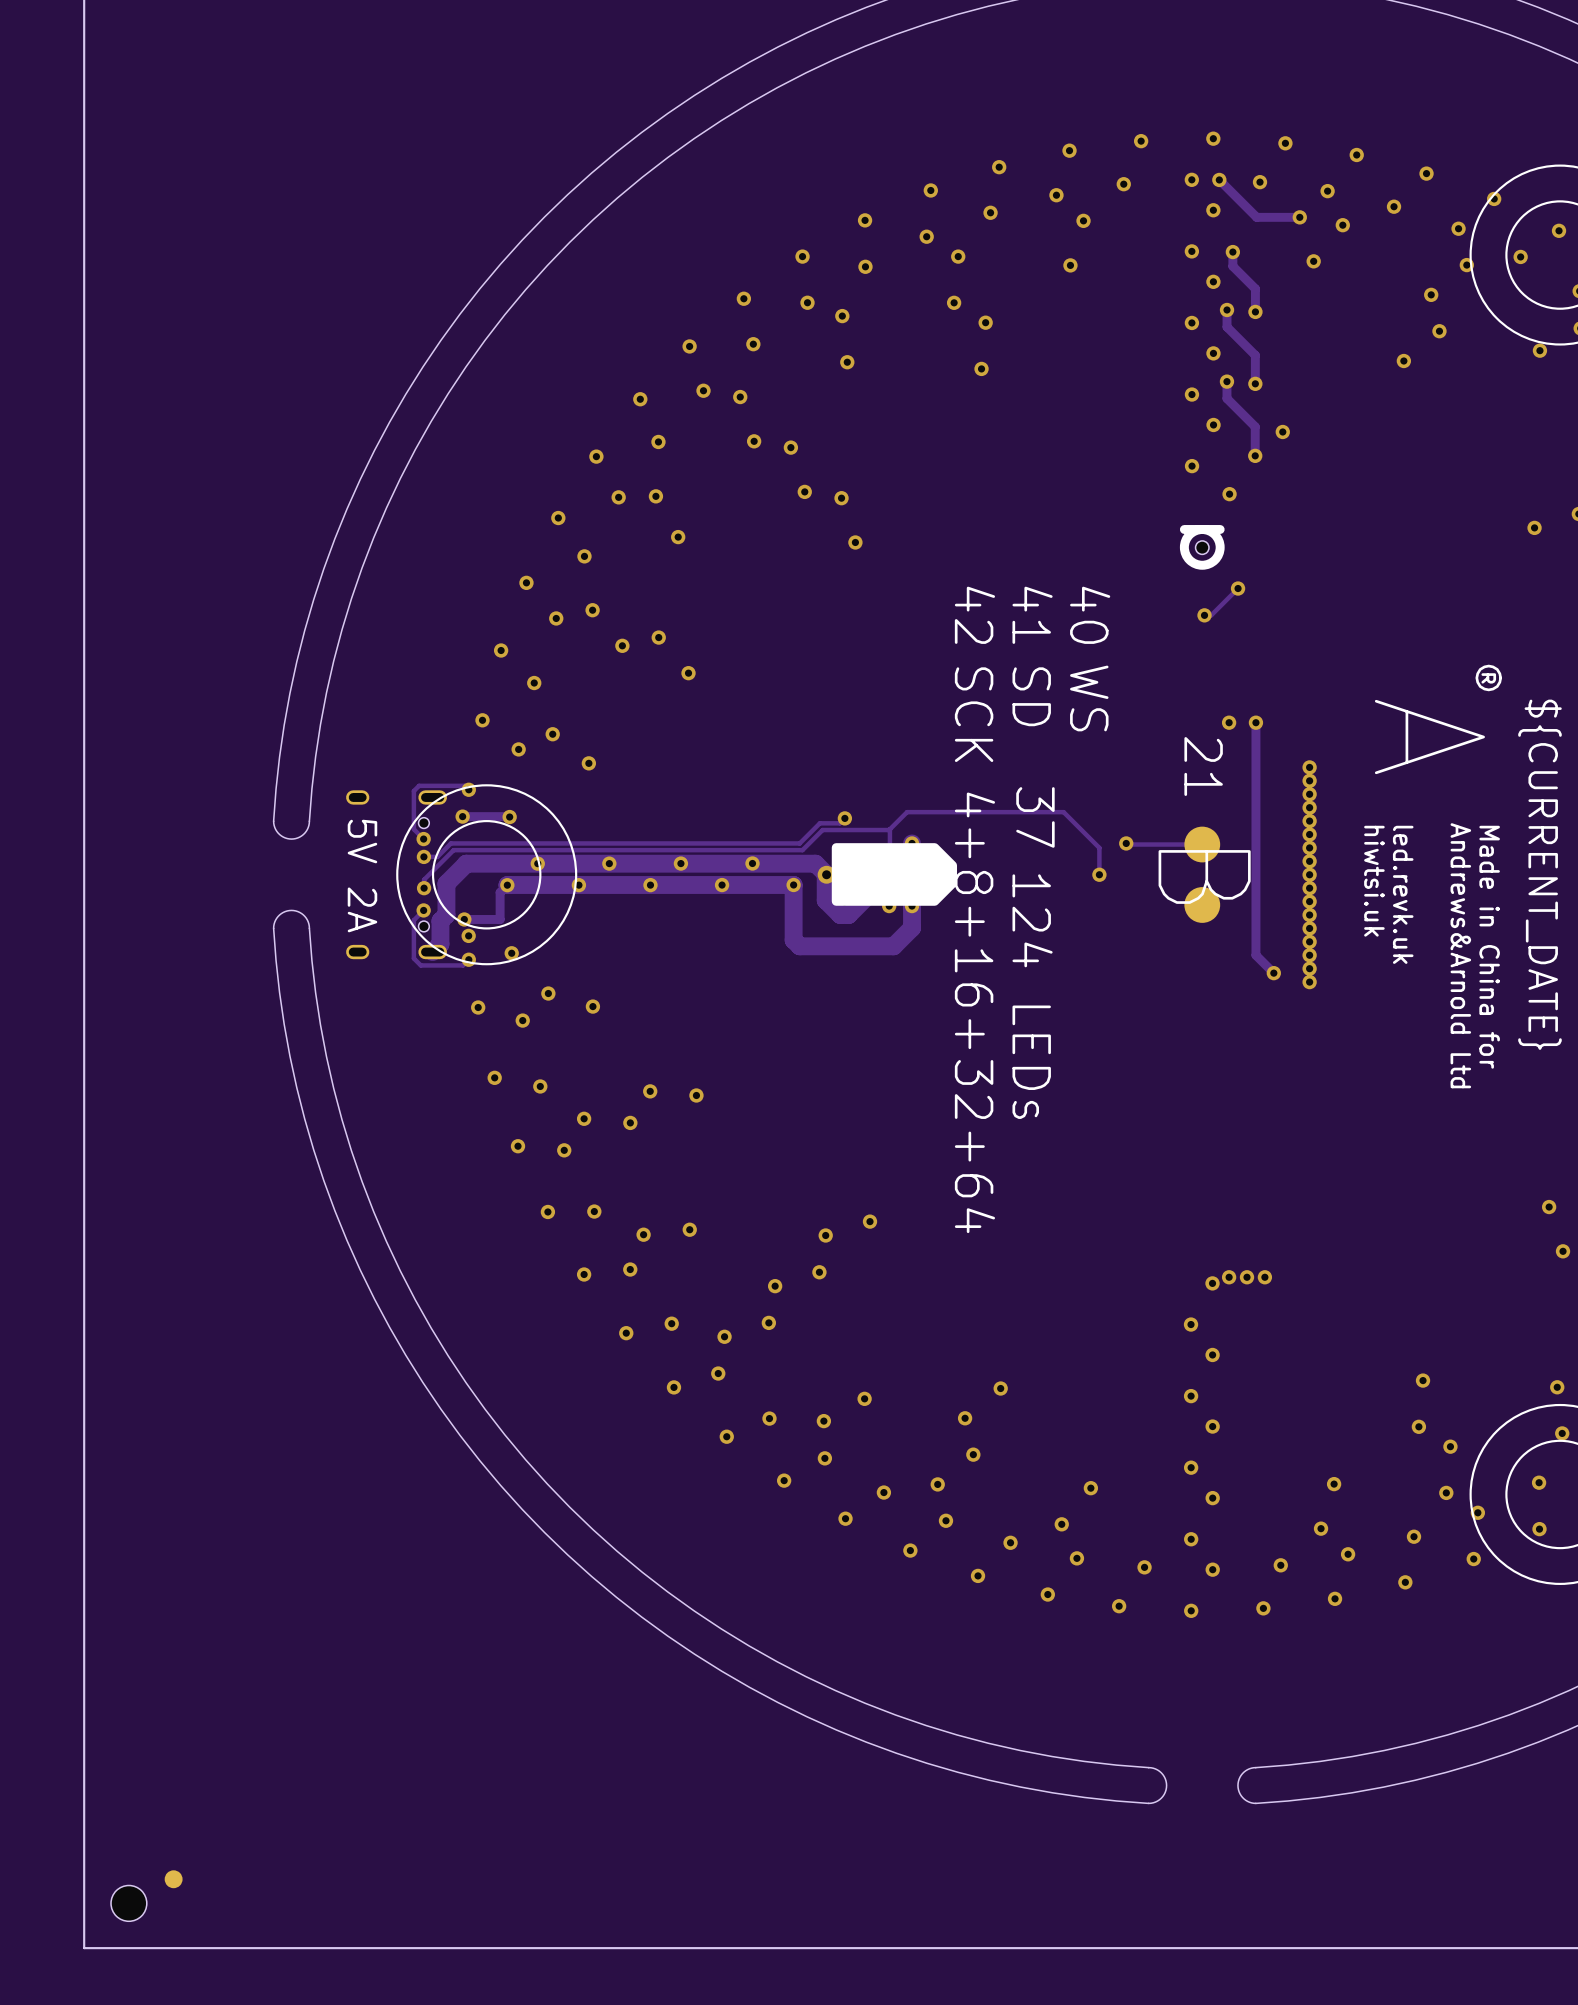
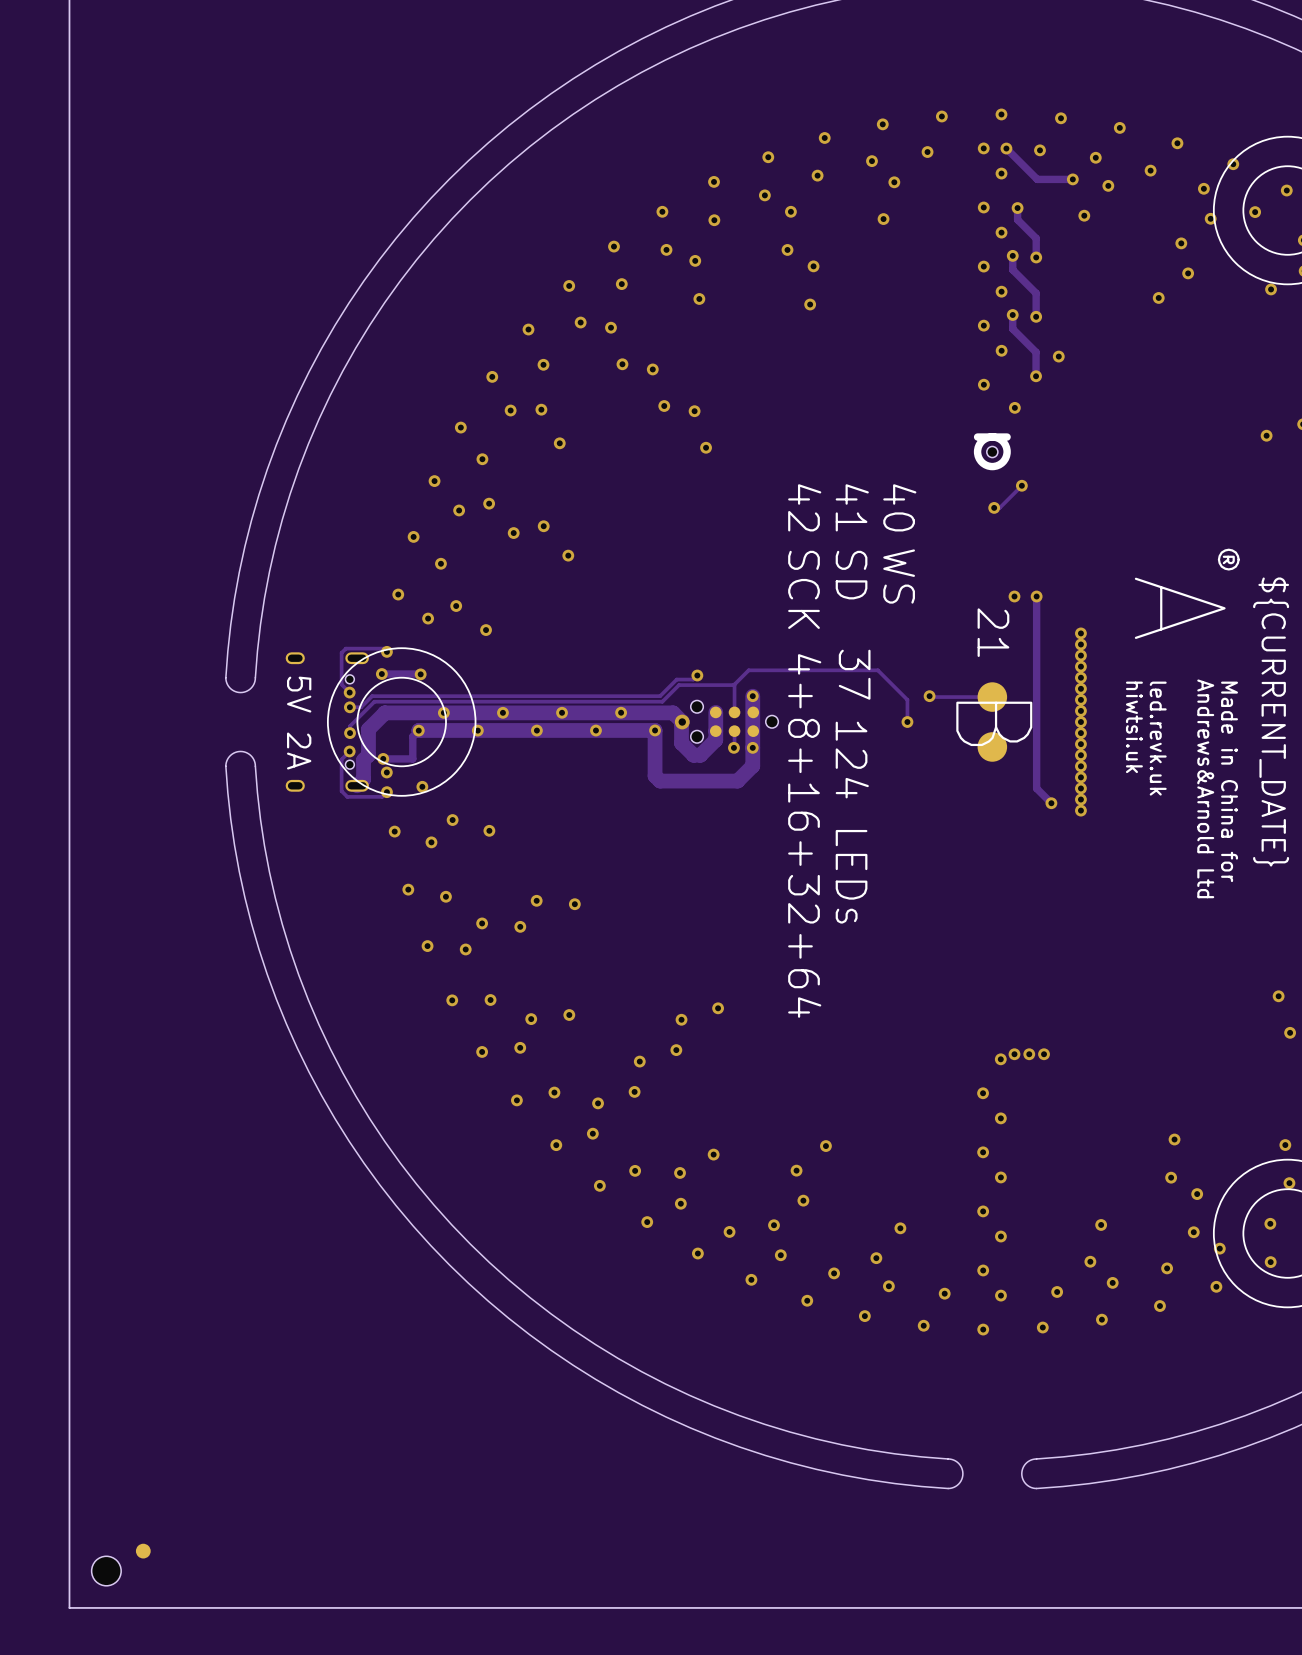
part footprint: [831, 843, 958, 906] -> [690, 700, 779, 744]

